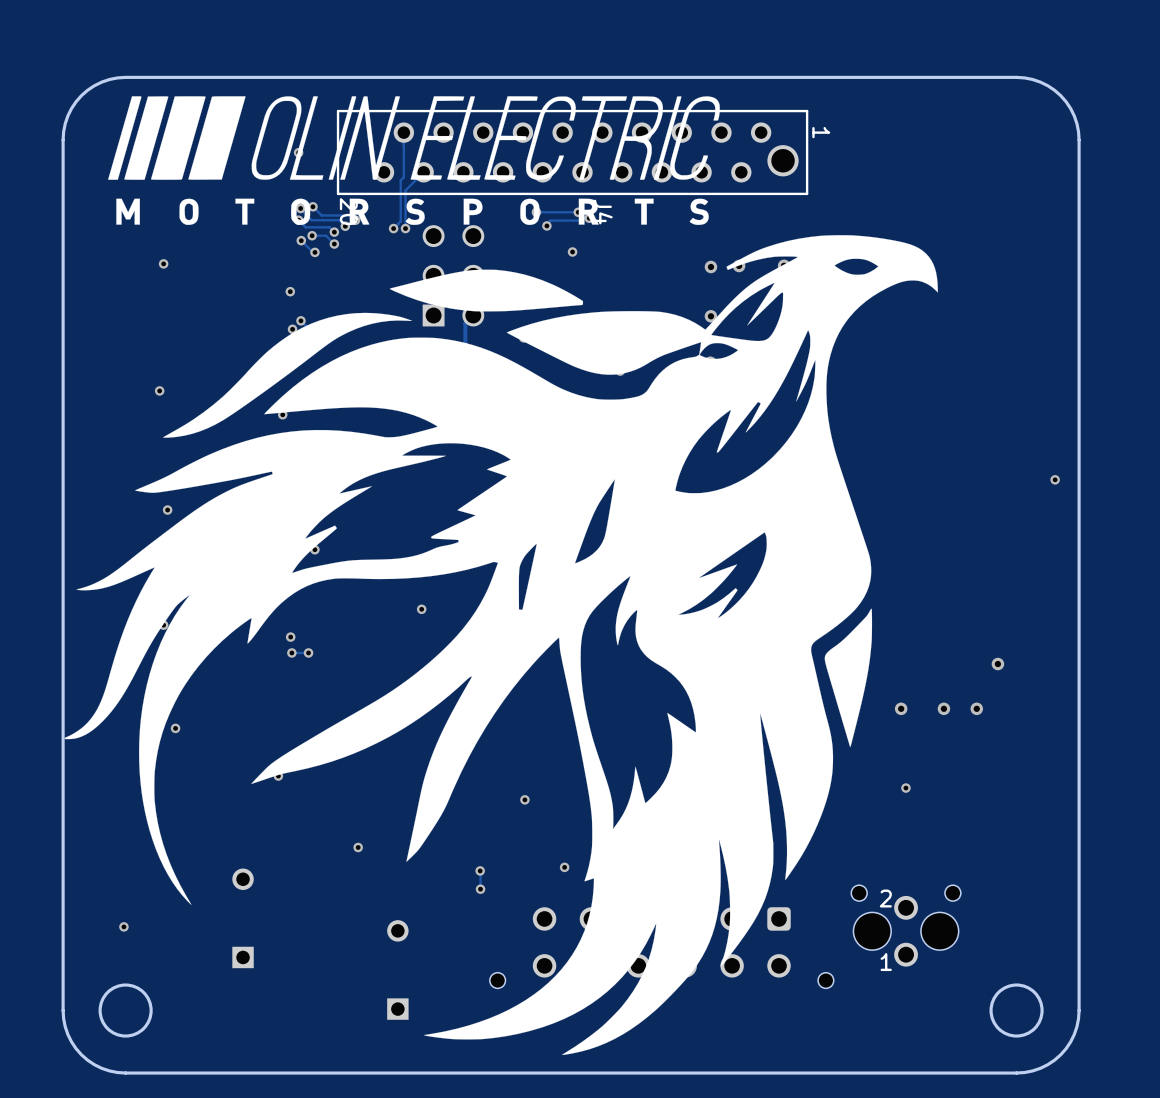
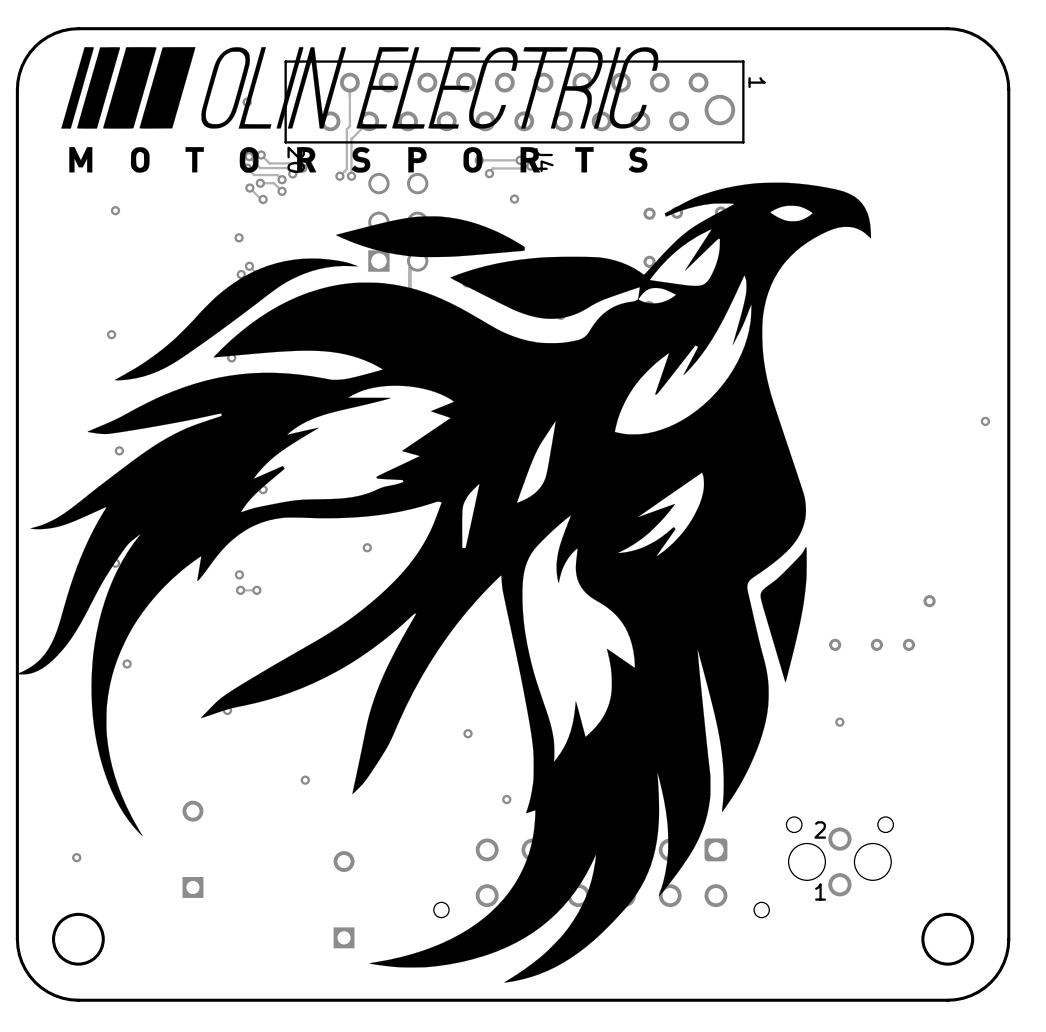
track: (480, 870) (480, 889) -> none
via: (480, 870) -> none
via: (480, 889) -> none

